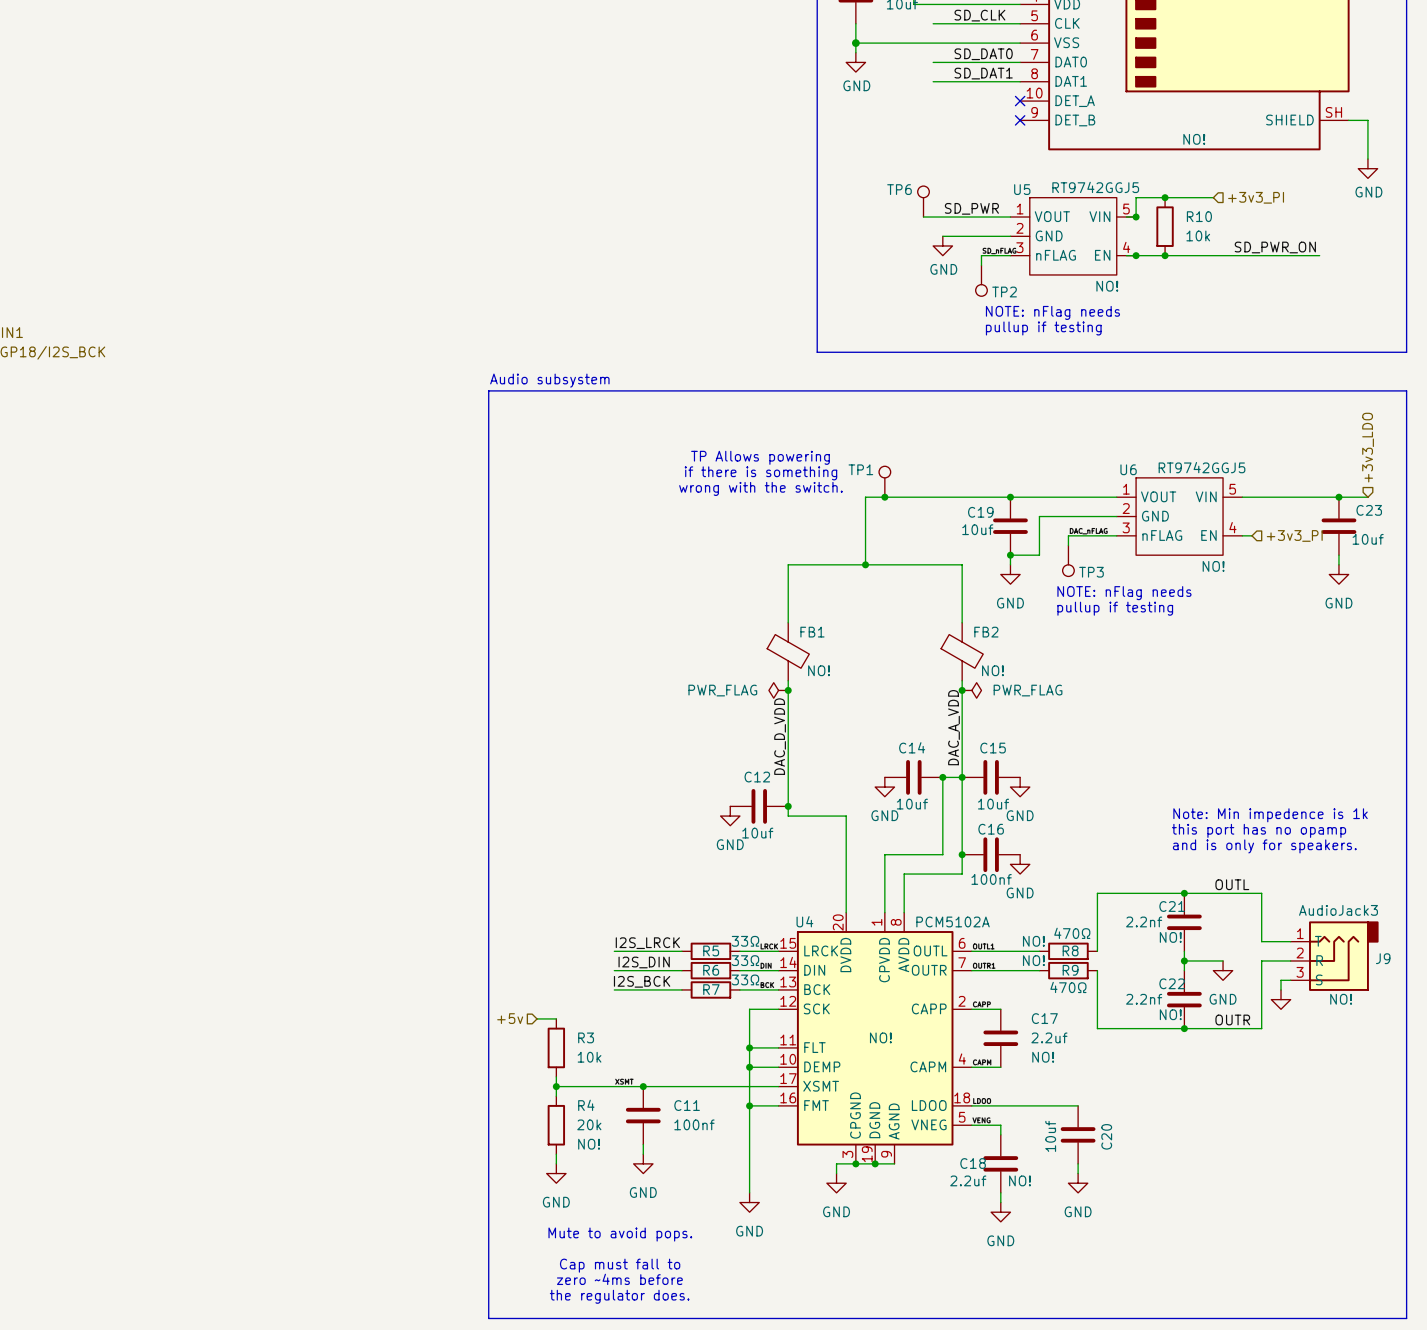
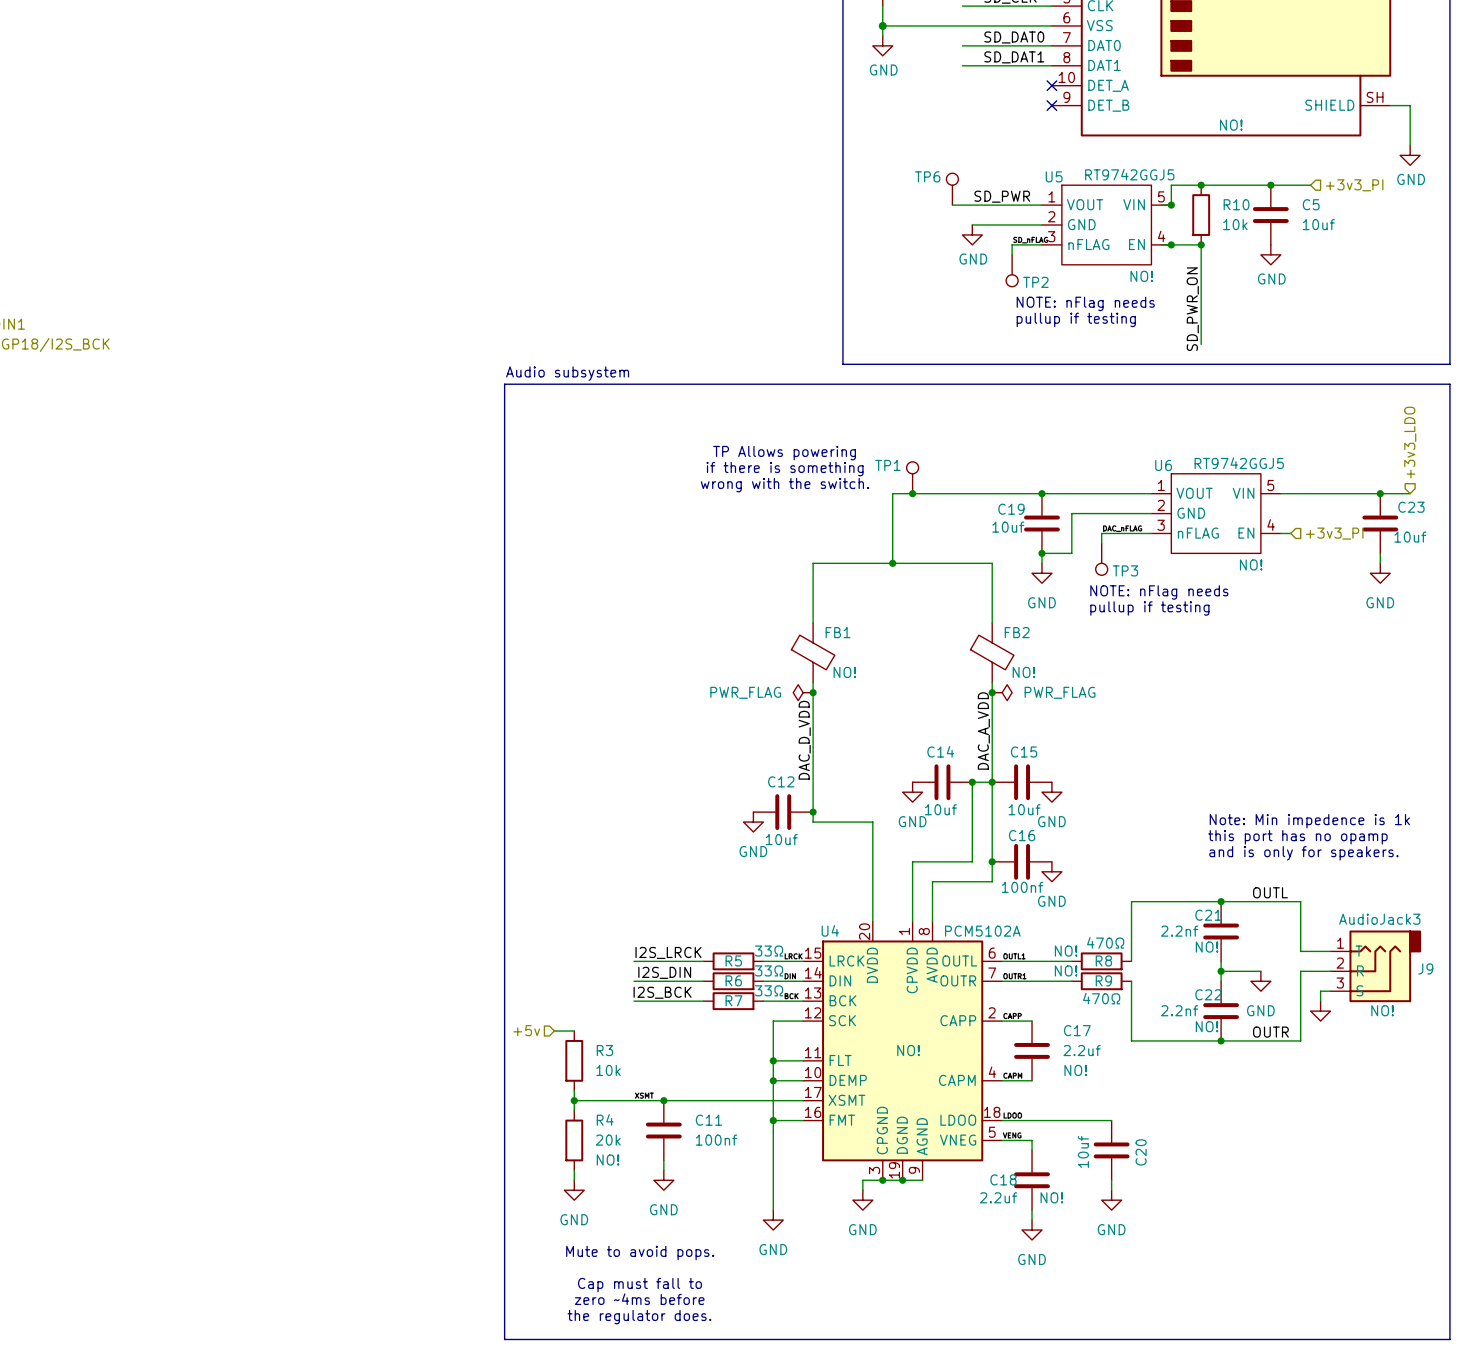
wire: none -> (1250, 185) (1310, 185)
junction: none -> (1270, 185)
hierarchical label position: +3v3_PI (1256, 197) -> +3v3_PI (1354, 185)
C5: none -> 10uf (1270, 215)
label rotation: 0° (1275, 247) -> 90° counterclockwise (1192, 309)
label position: SD_PWR_ON (1275, 247) -> SD_PWR_ON (1192, 309)
wire: (1165, 255) (1319, 255) -> (1201, 244) (1201, 344)
power symbol: none -> GND (1270, 254)
line: (817, 352) (1406, 352) -> (842, 344) (842, 364) (1449, 364) (1449, 344)

